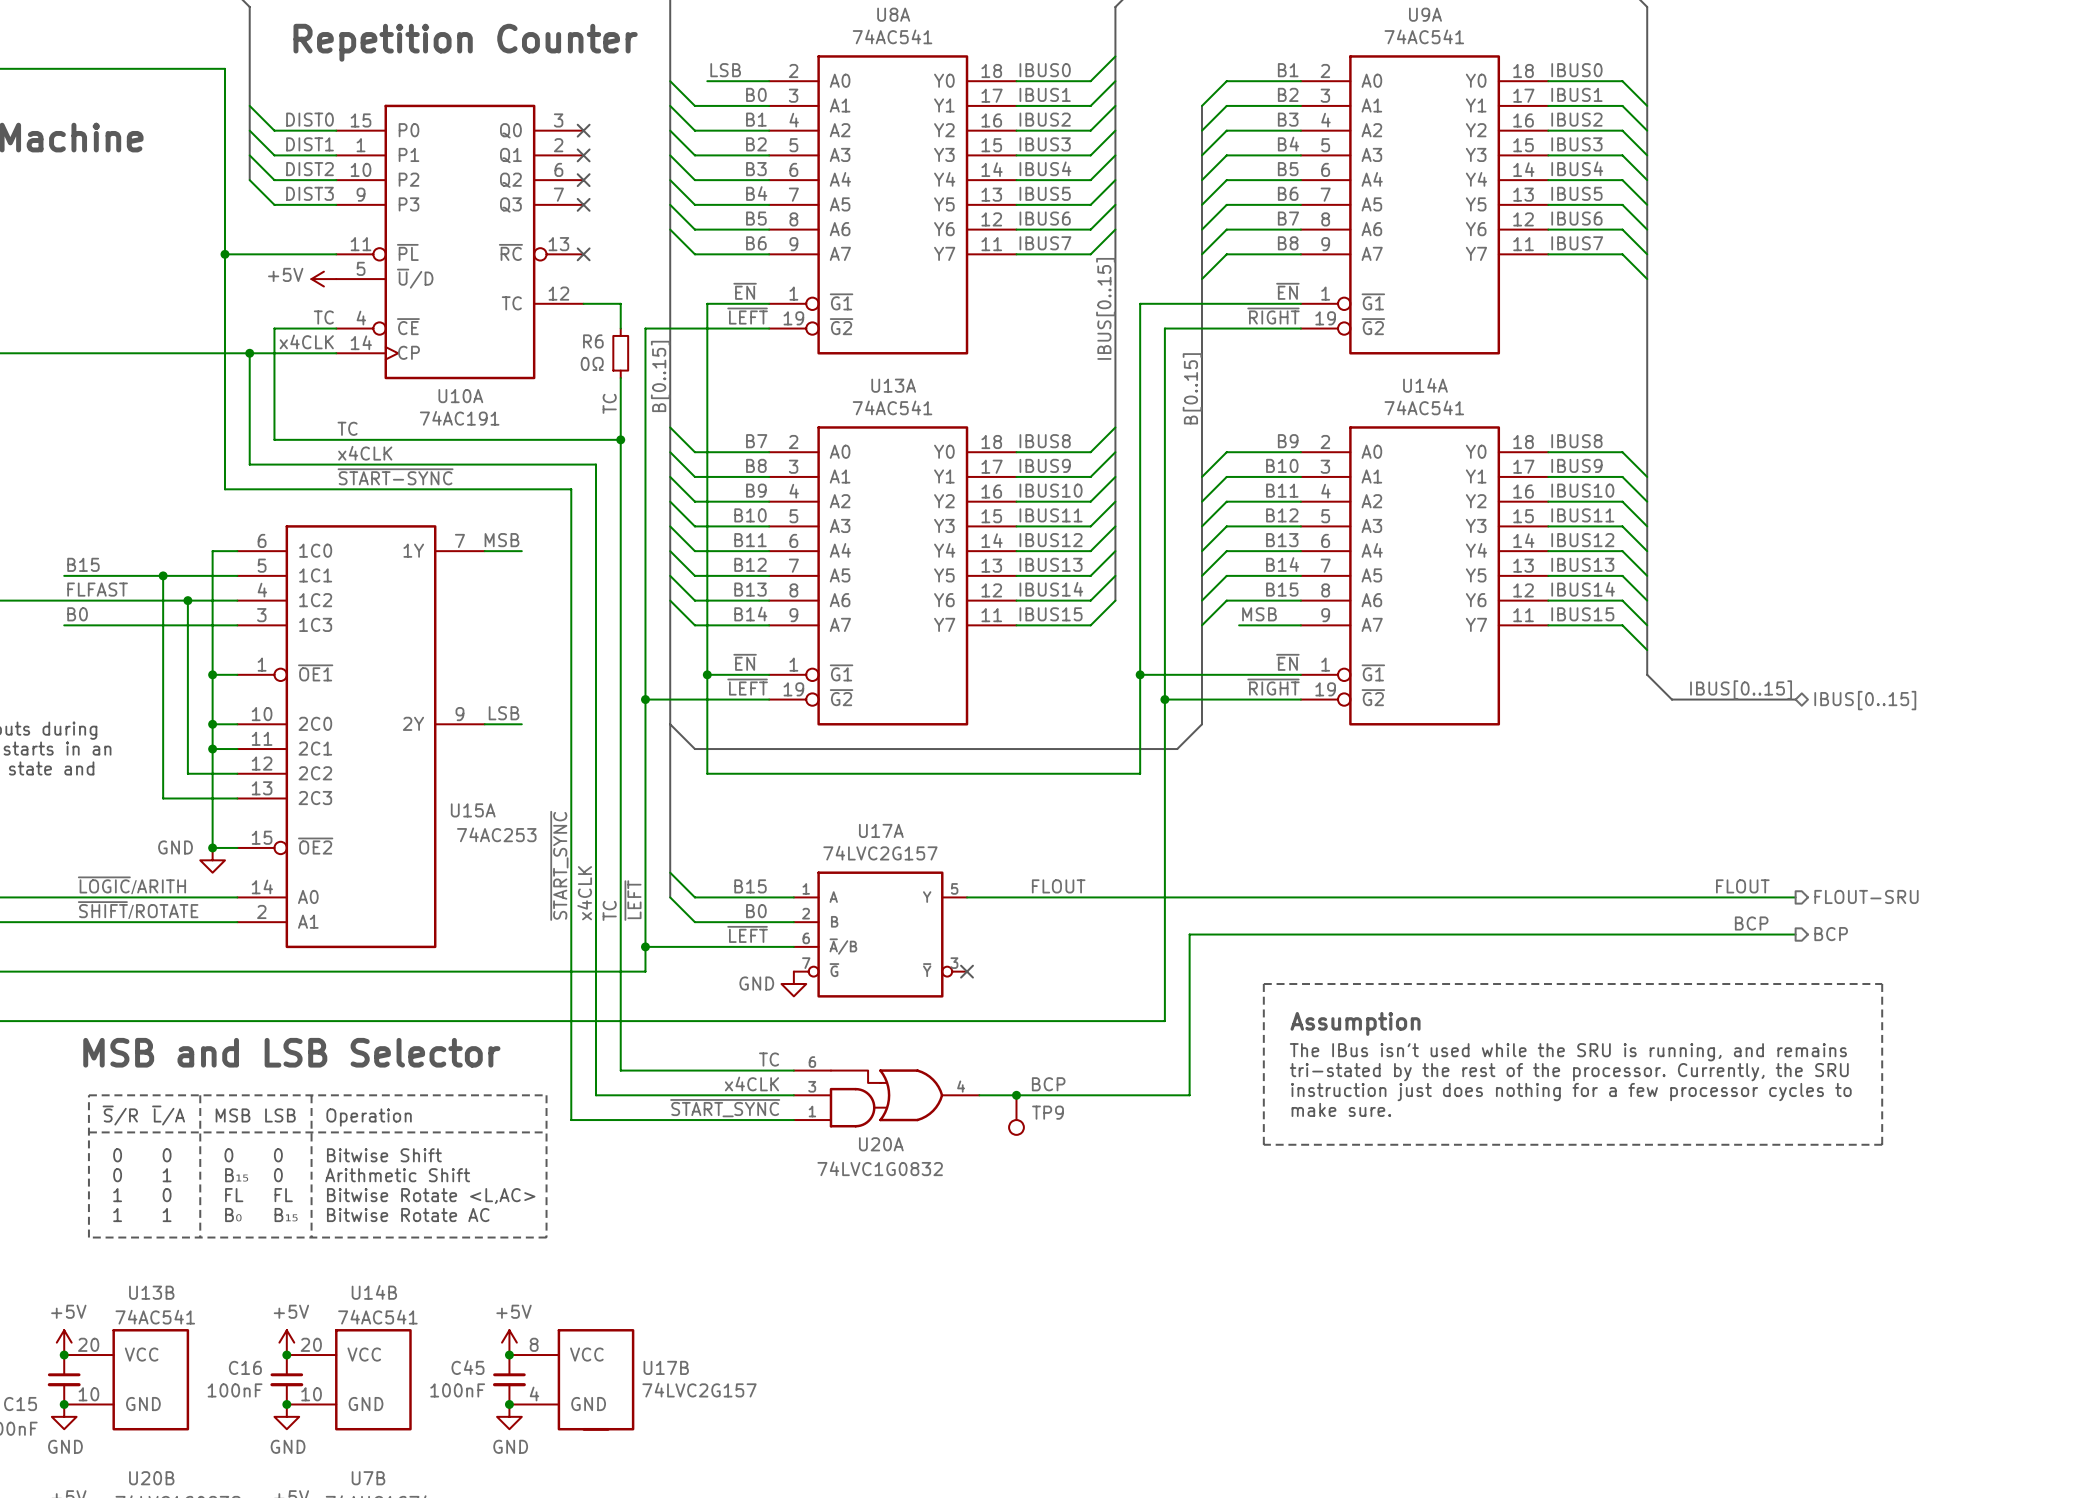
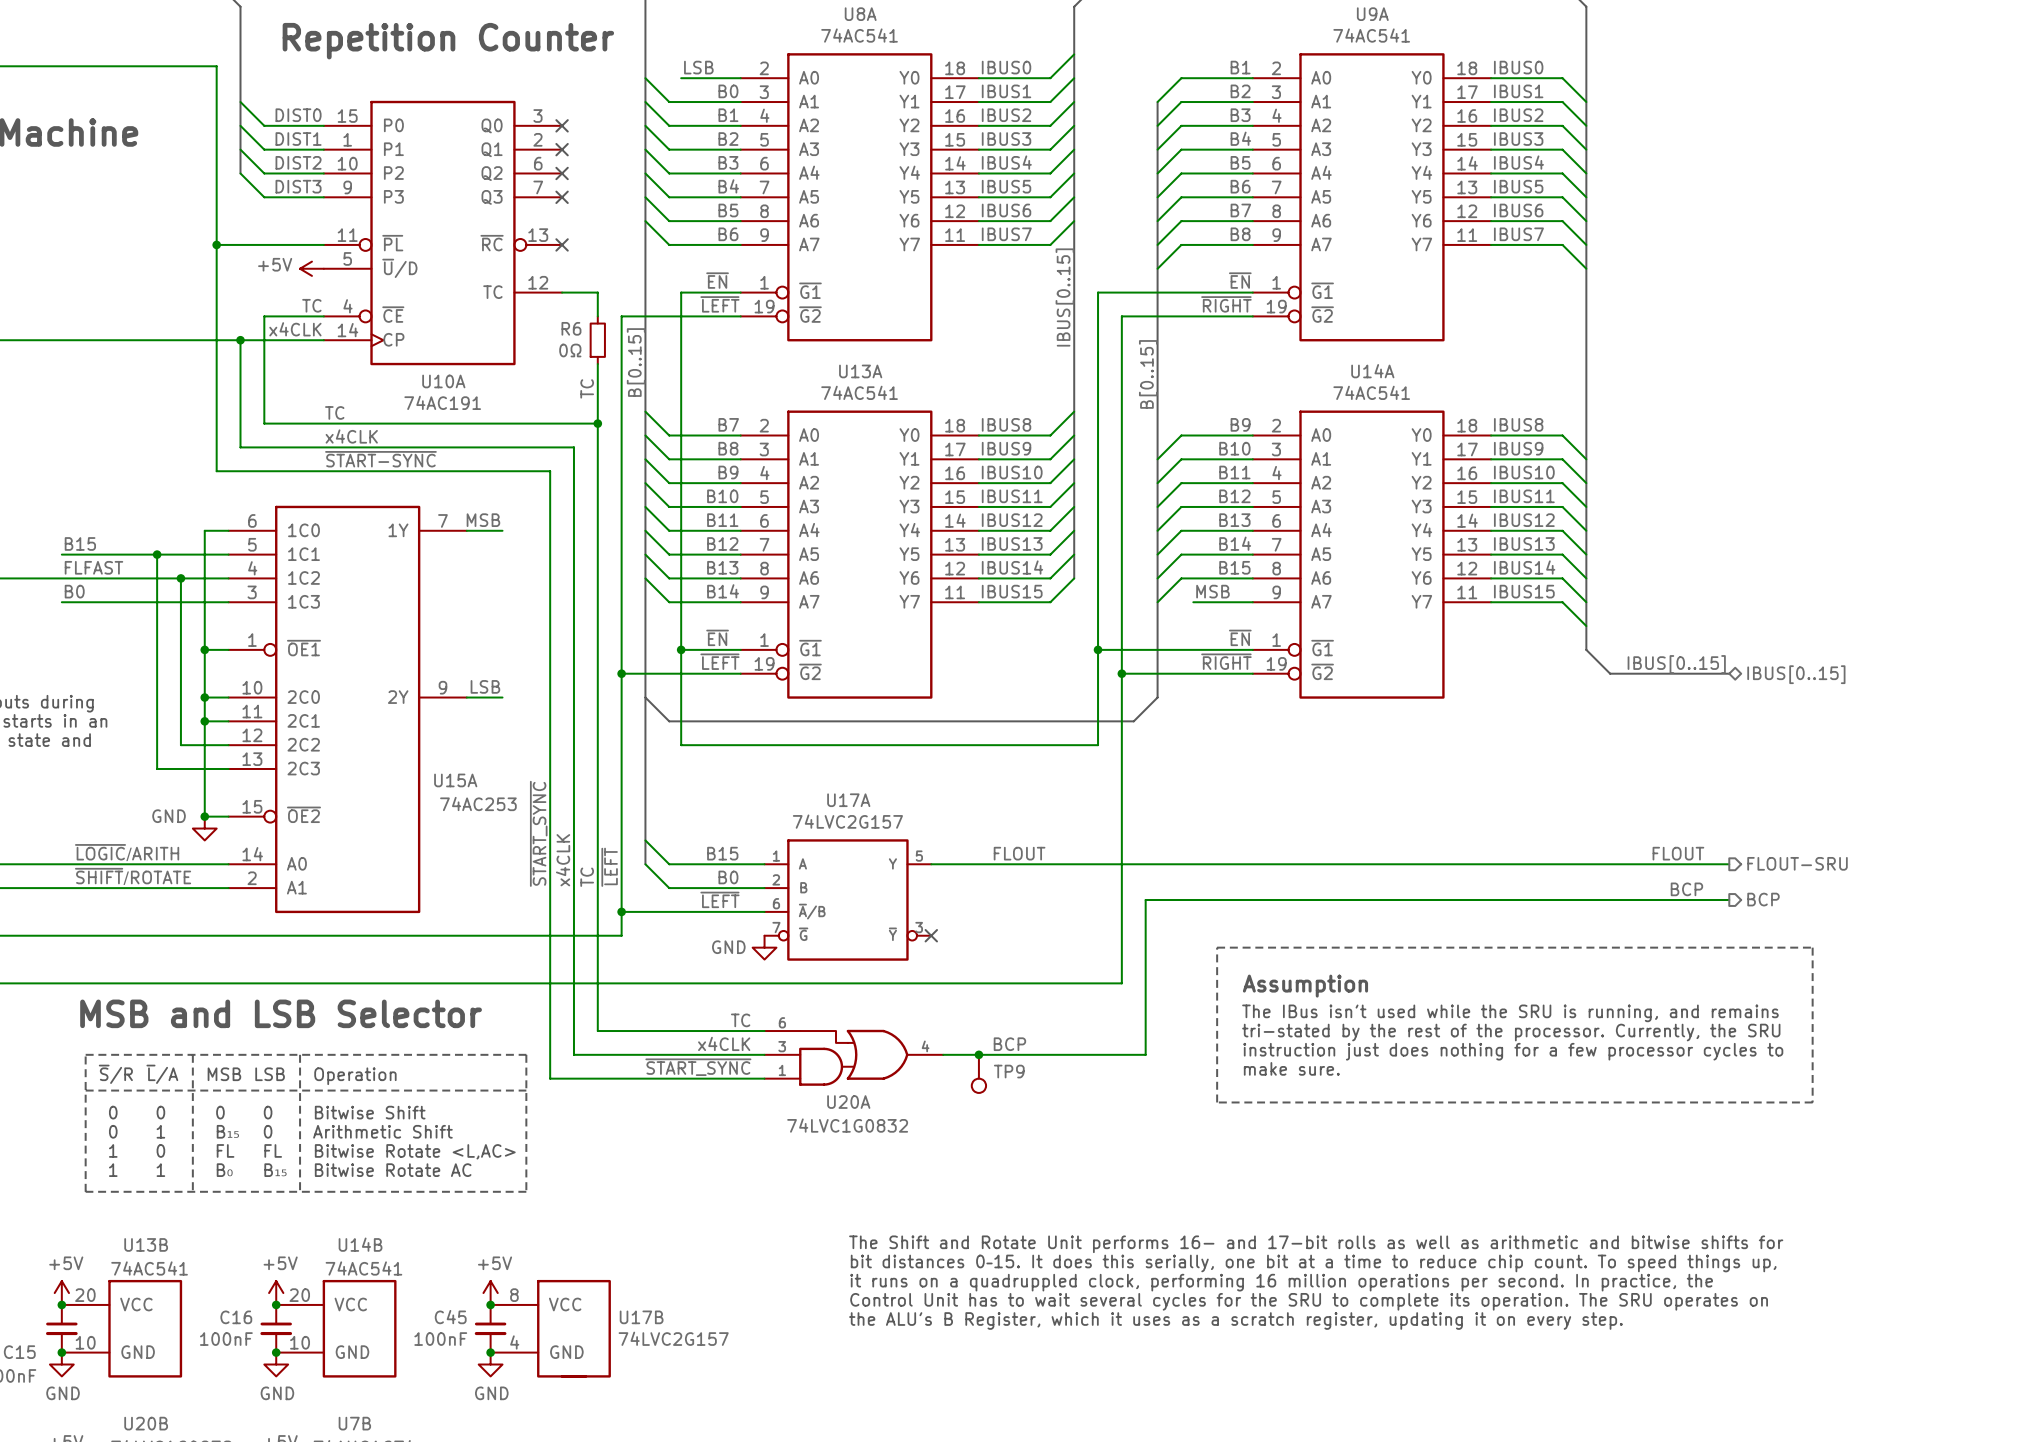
text: none -> The Shift and Rotate Unit performs 16- and 17-bit rolls as well as arithmetic and bitwise shifts for (1316, 1244)
text: none -> bit distances 0–15. It does this serially, one bit at a time to reduce chip count. To speed things up, (1313, 1263)
text: none -> it runs on a quadruppled clock, performing 16 million operations per second. In practice, the (1281, 1282)
text: none -> Control Unit has to wait several cycles for the SRU to complete its operation. The SRU operates on (1309, 1301)
text: none -> the ALU's B Register, which it uses as a scratch register, updating it on every step. (1235, 1321)

